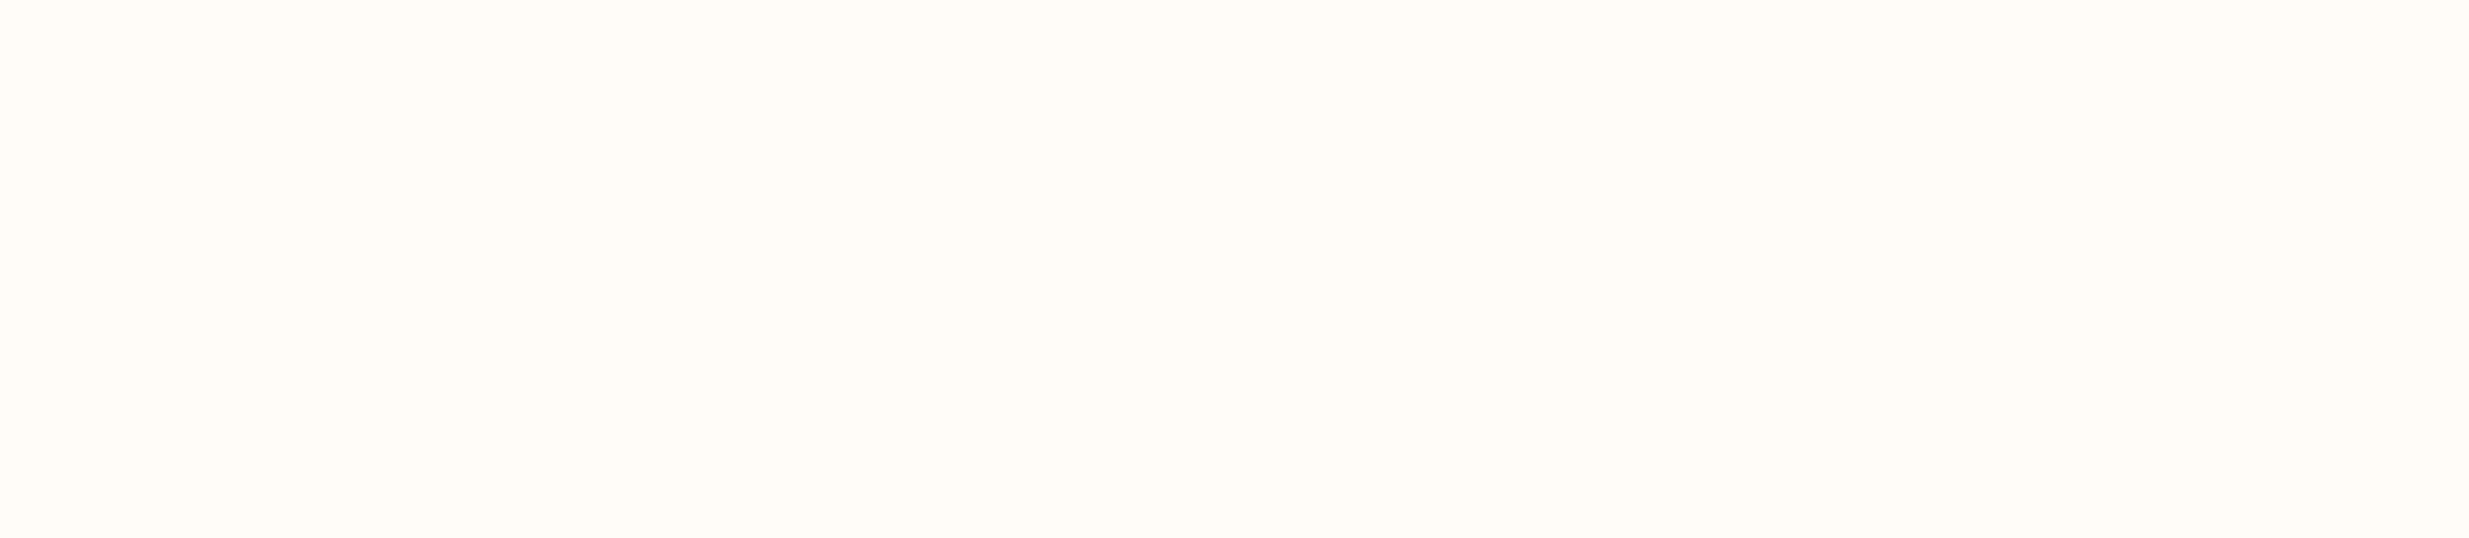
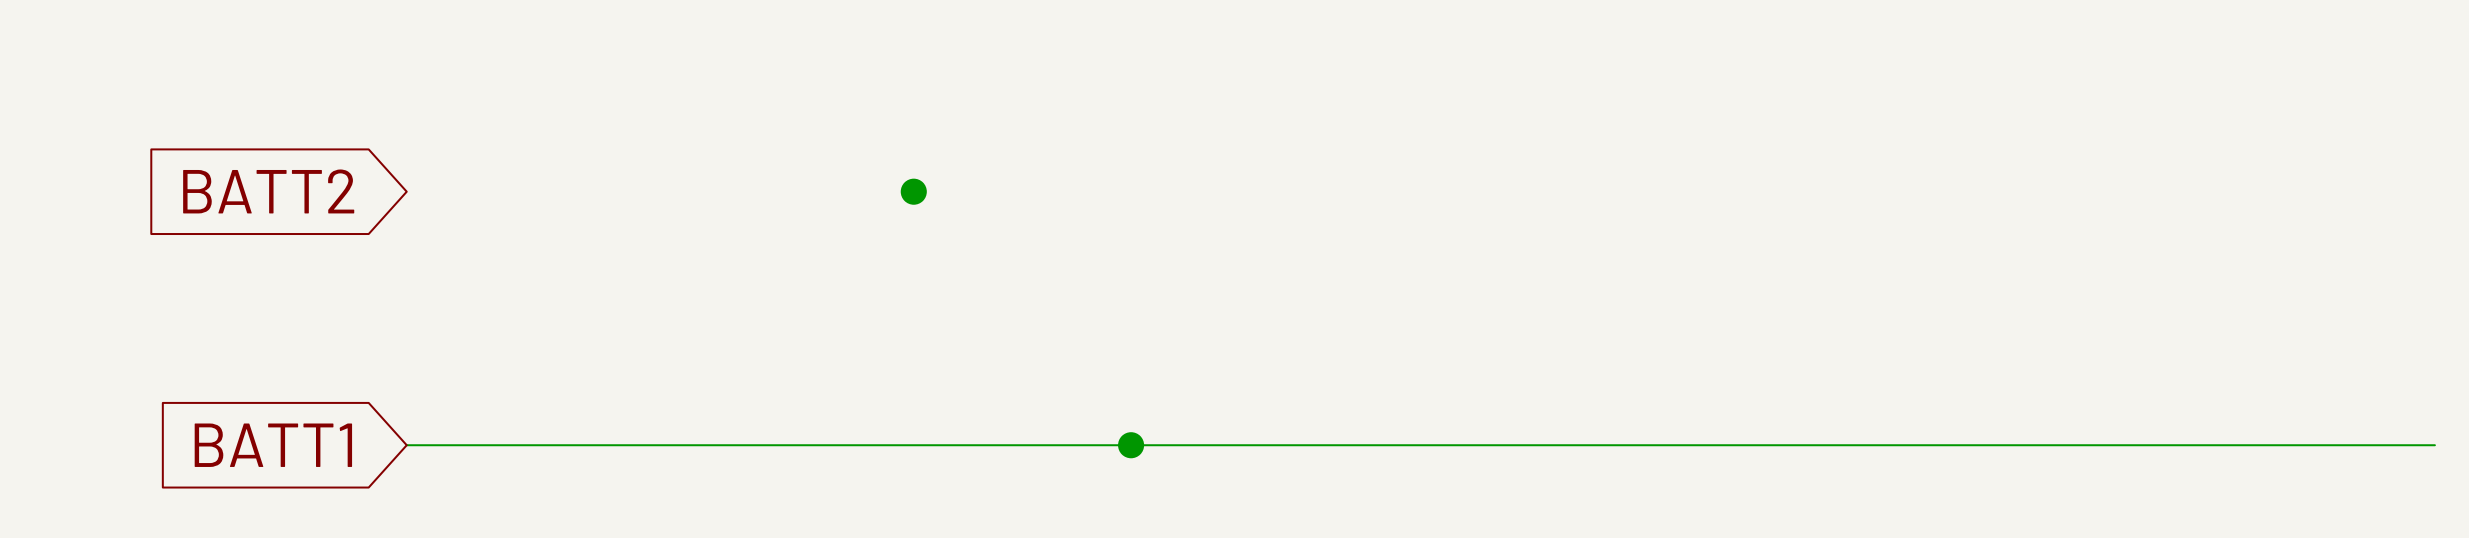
global label: none -> BATT2 (268, 191)
junction: none -> (913, 191)
global label: none -> BATT1 (273, 445)
wire: none -> (406, 445) (2434, 445)
junction: none -> (1131, 445)

